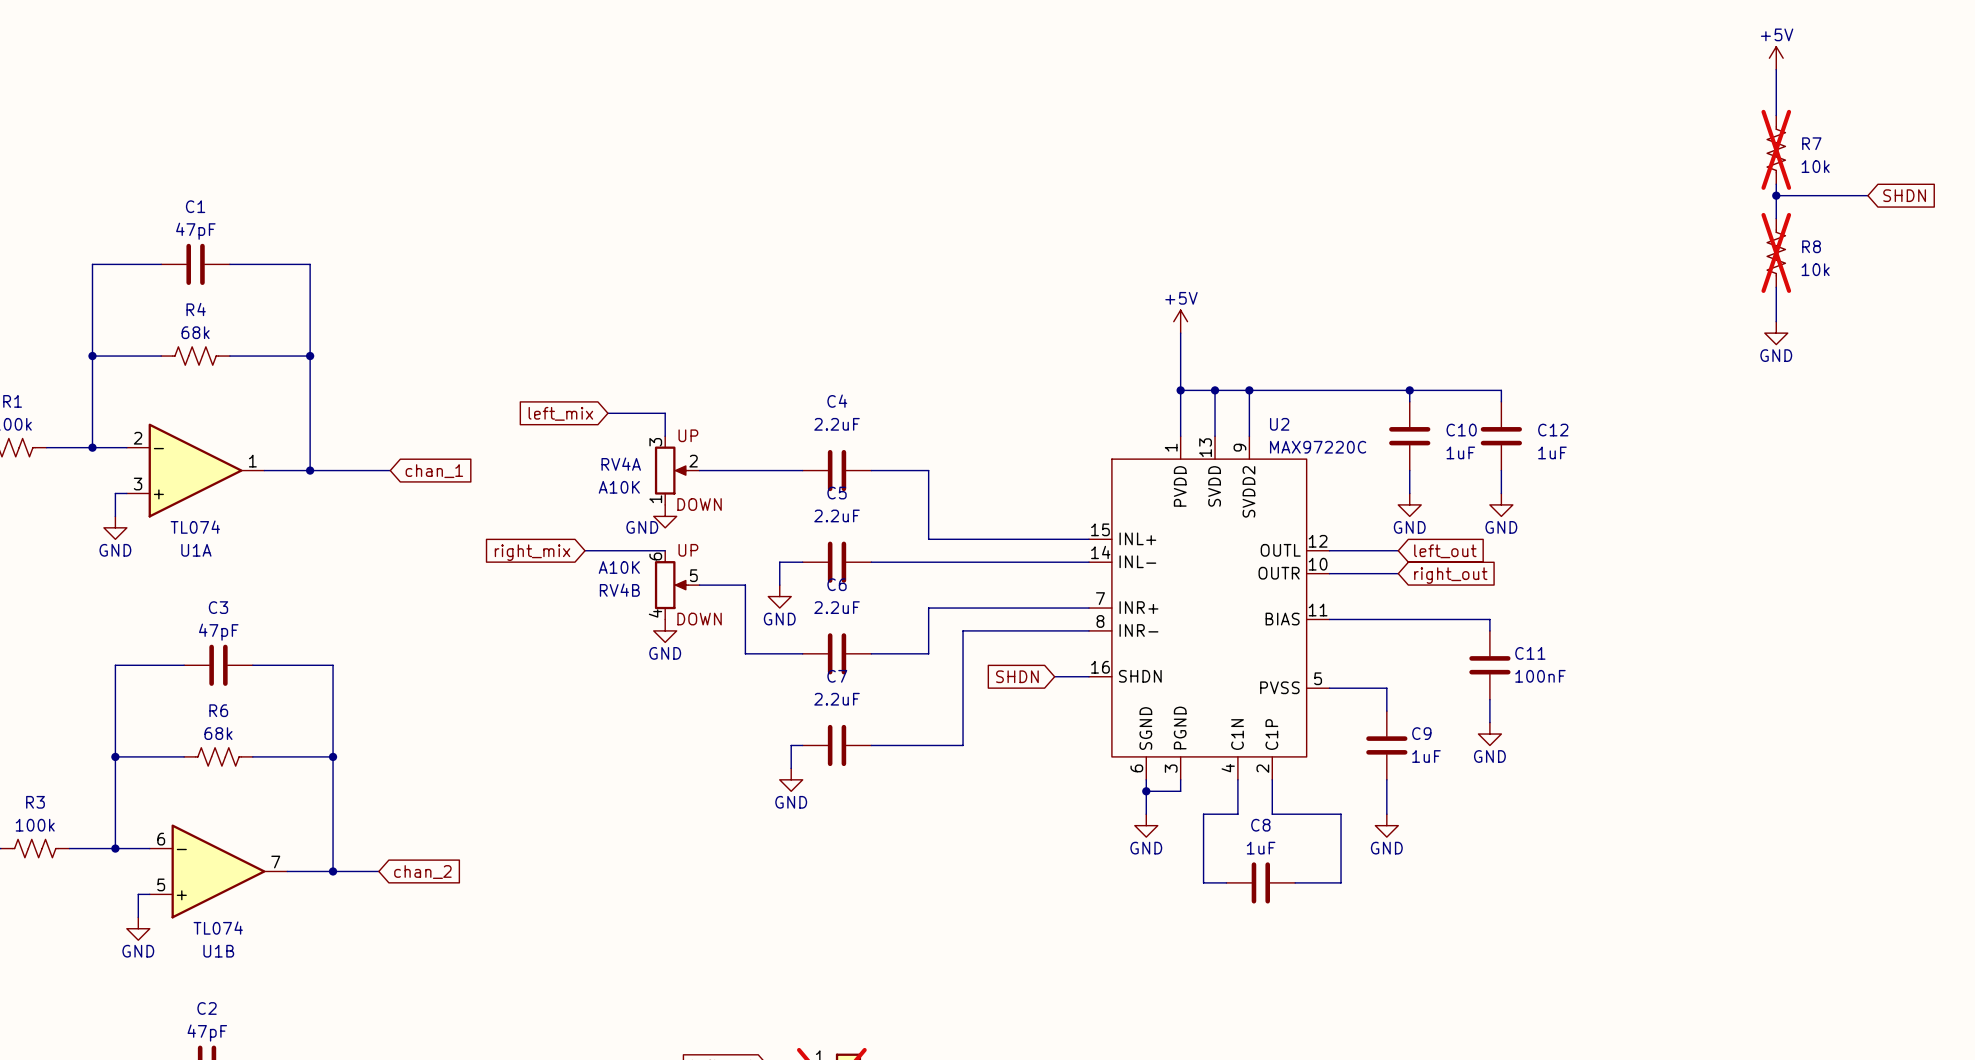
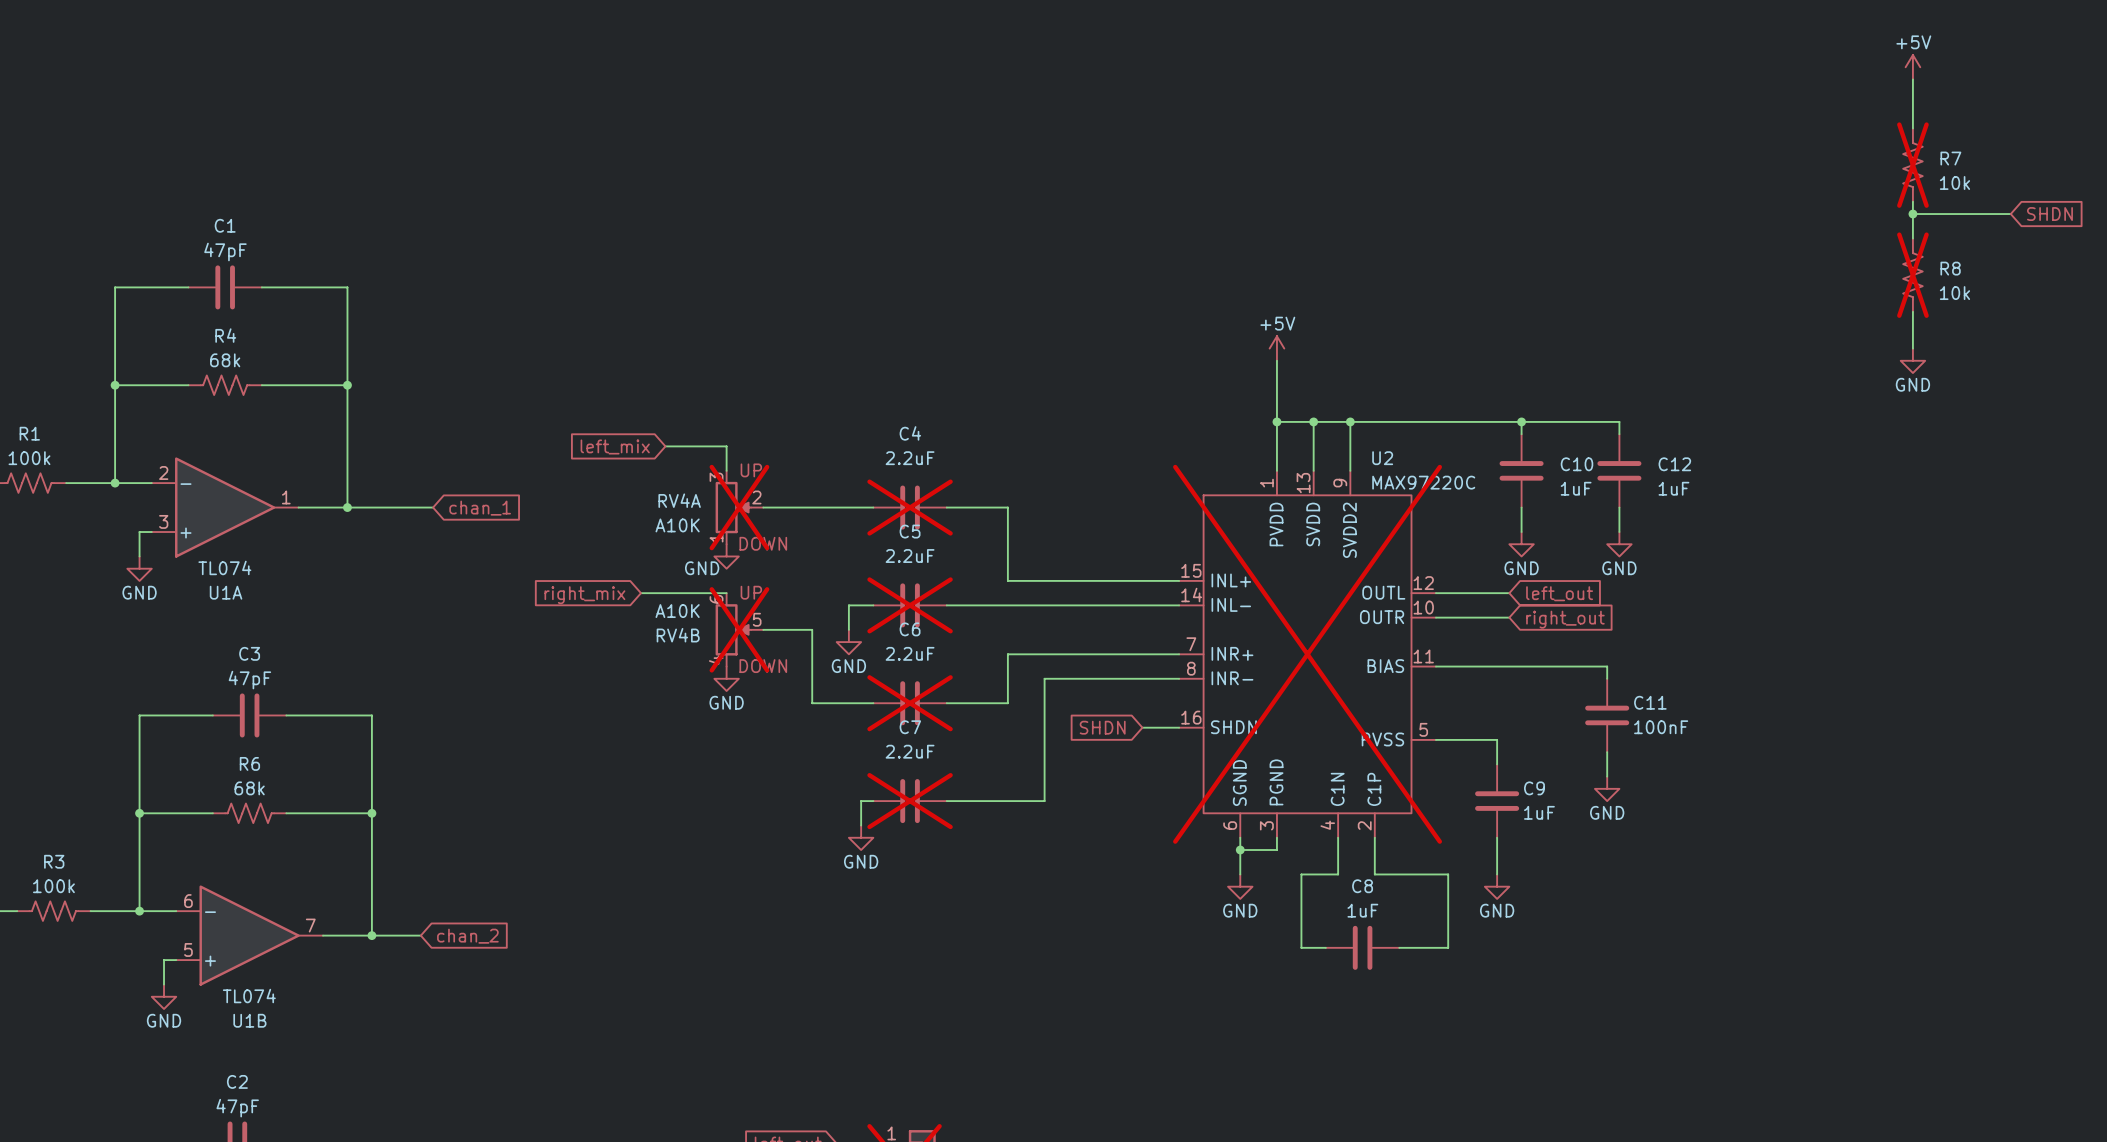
RV4A do-not-place cross: none -> (739, 507)
C4 do-not-place cross: none -> (910, 507)
C5 do-not-place cross: none -> (910, 605)
RV4B do-not-place cross: none -> (739, 629)
U2 do-not-place cross: none -> (1307, 654)
C6 do-not-place cross: none -> (910, 703)
C7 do-not-place cross: none -> (910, 801)

